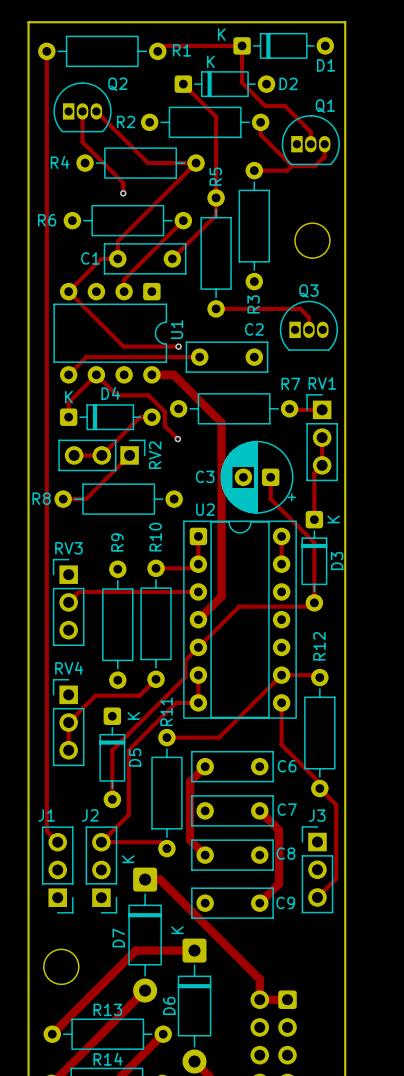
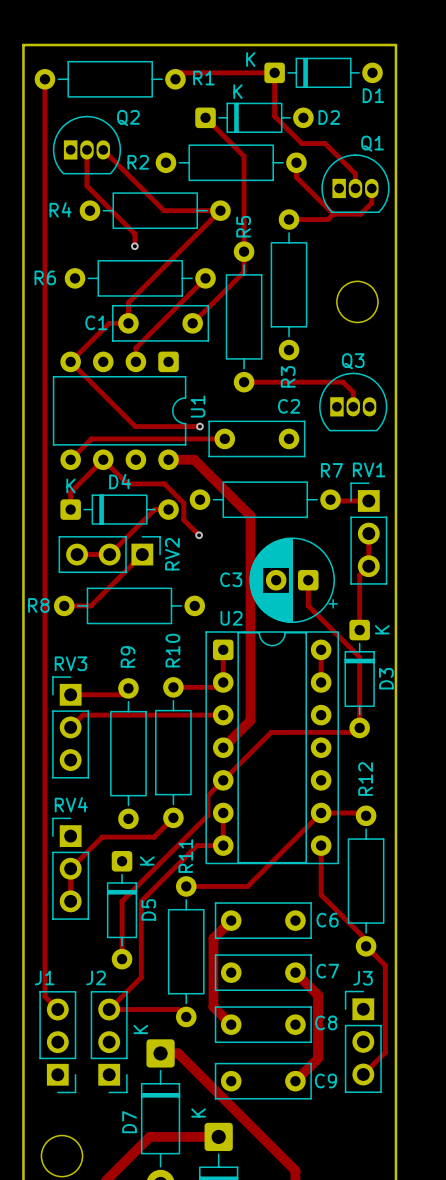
track: none -> (128, 688) (122, 694) (70, 694)

